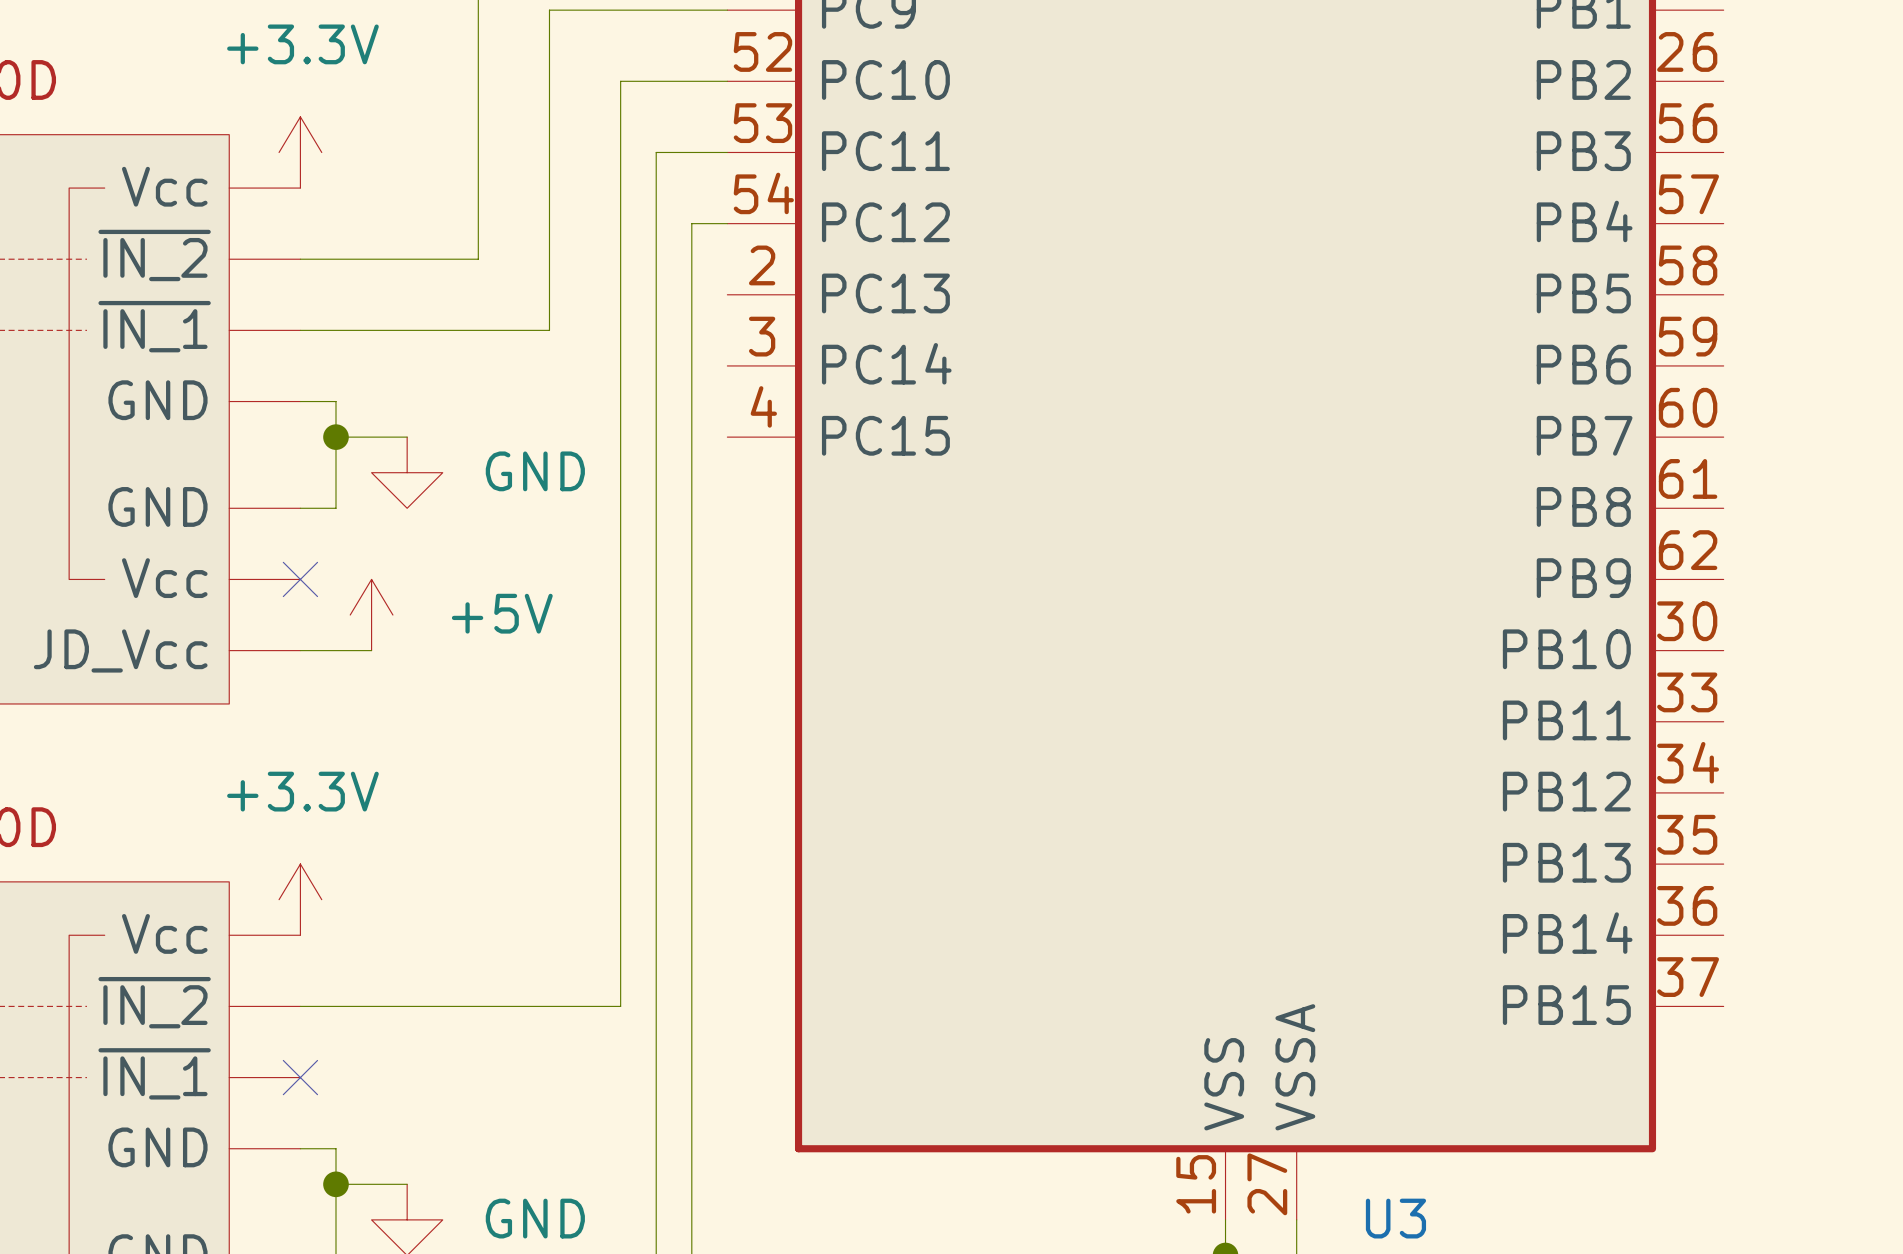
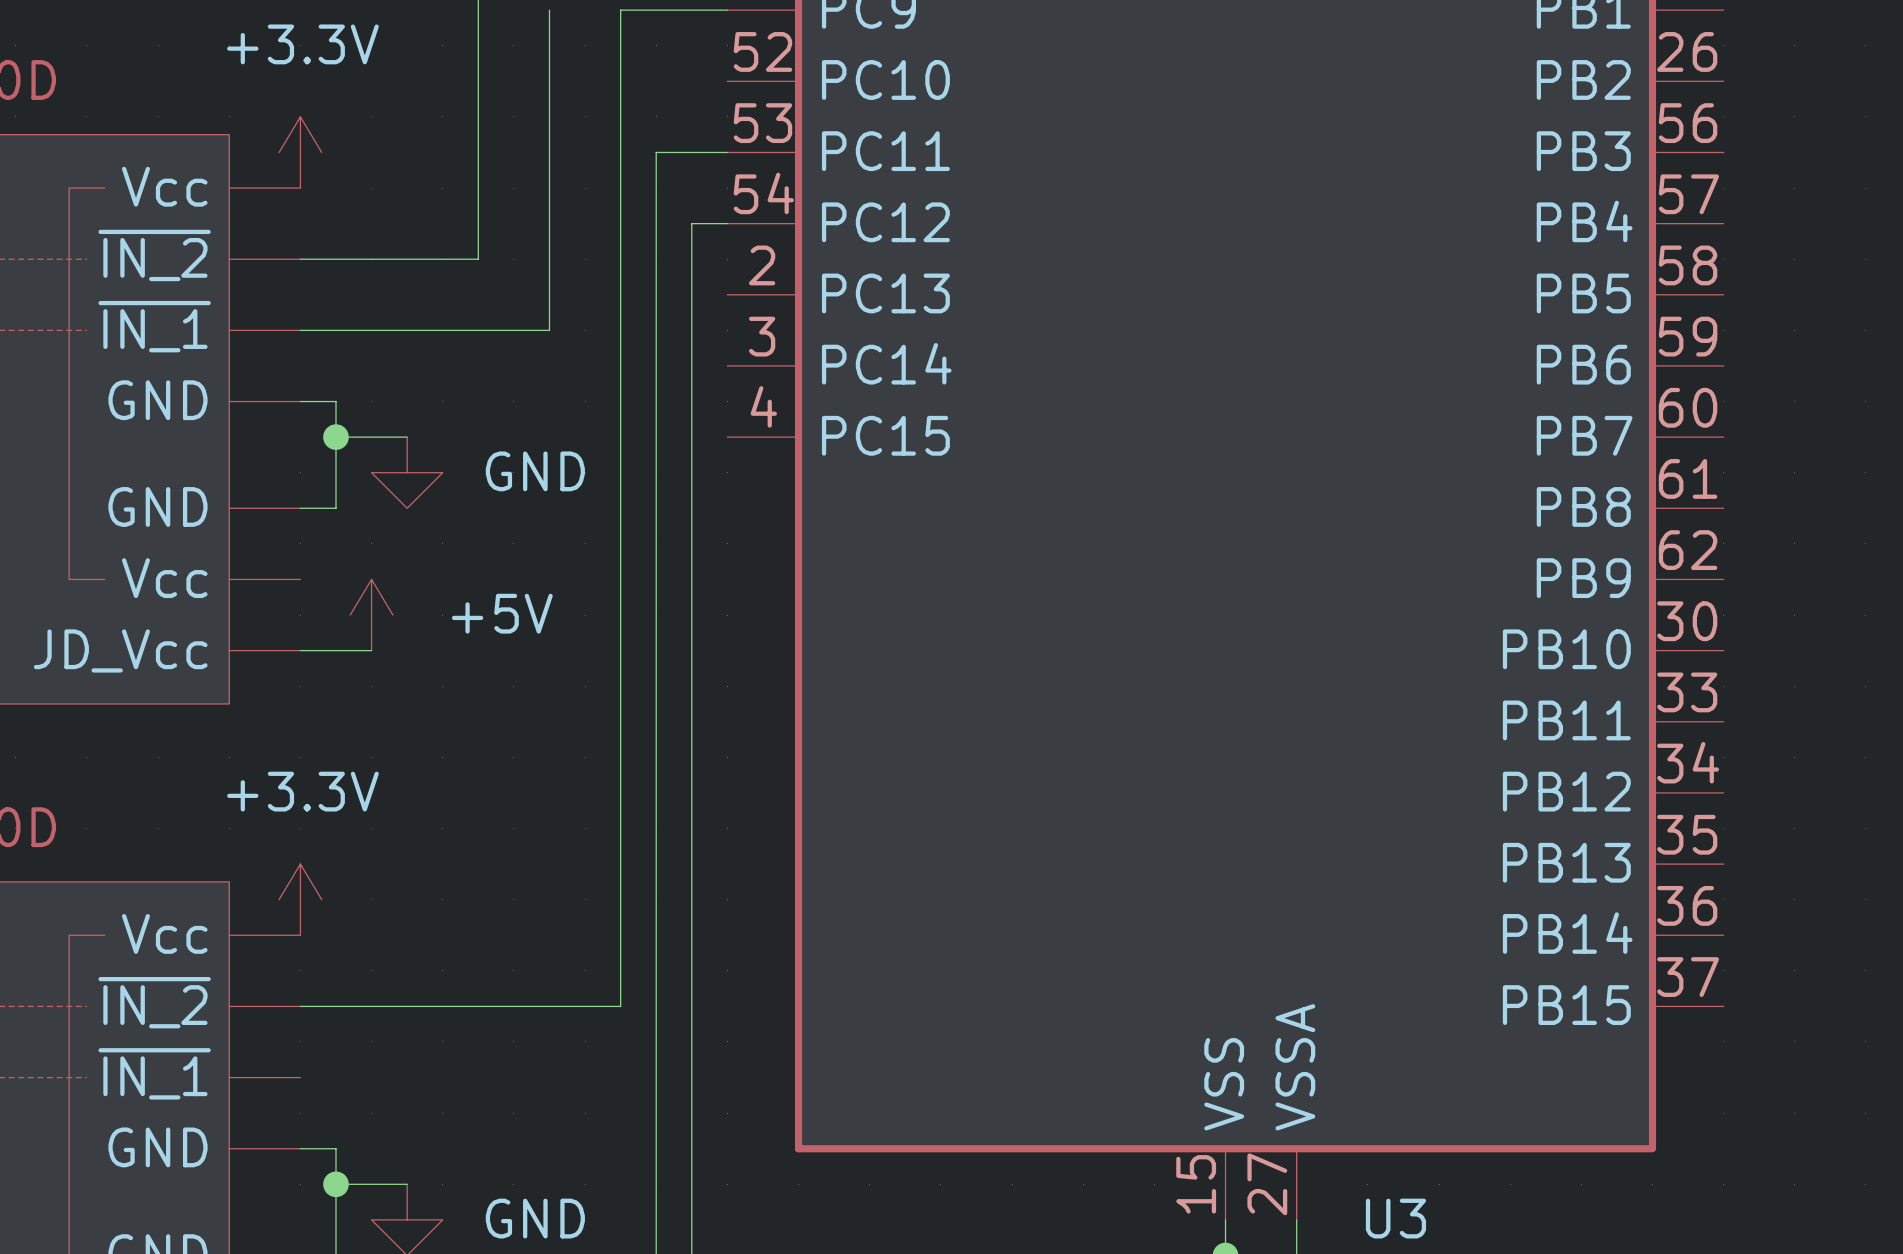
wire: (549, 10) (620, 10) -> (620, 81) (620, 10)
wire: (620, 81) (727, 81) -> none
no-connect mark: (300, 579) -> none
no-connect mark: (300, 1077) -> none

